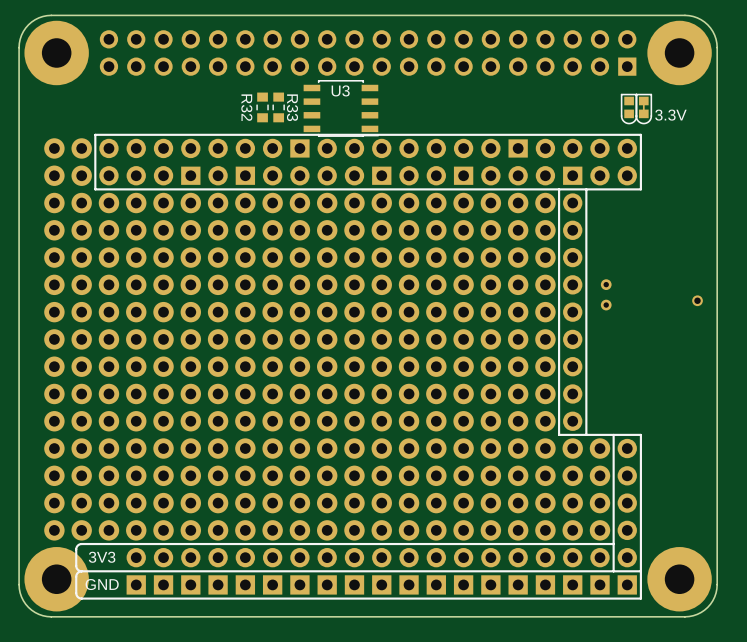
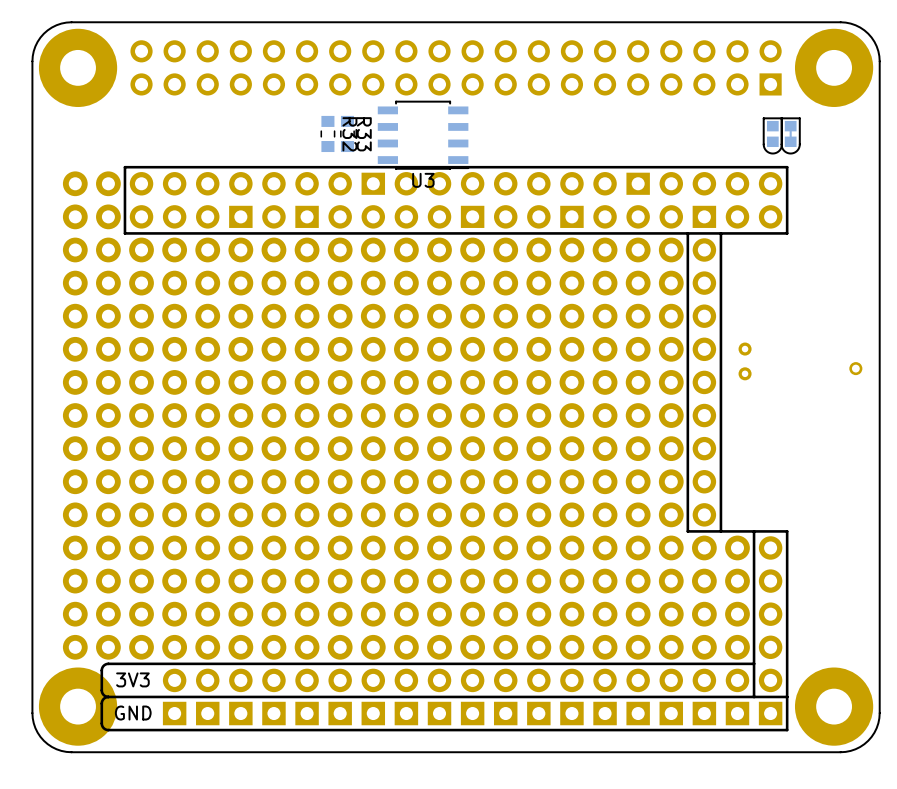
U3 name position: U3 (340, 90) -> U3 (423, 180)
R32 name position: R32 (246, 107) -> R32 (349, 134)
text: 3.3V (670, 115) -> none

